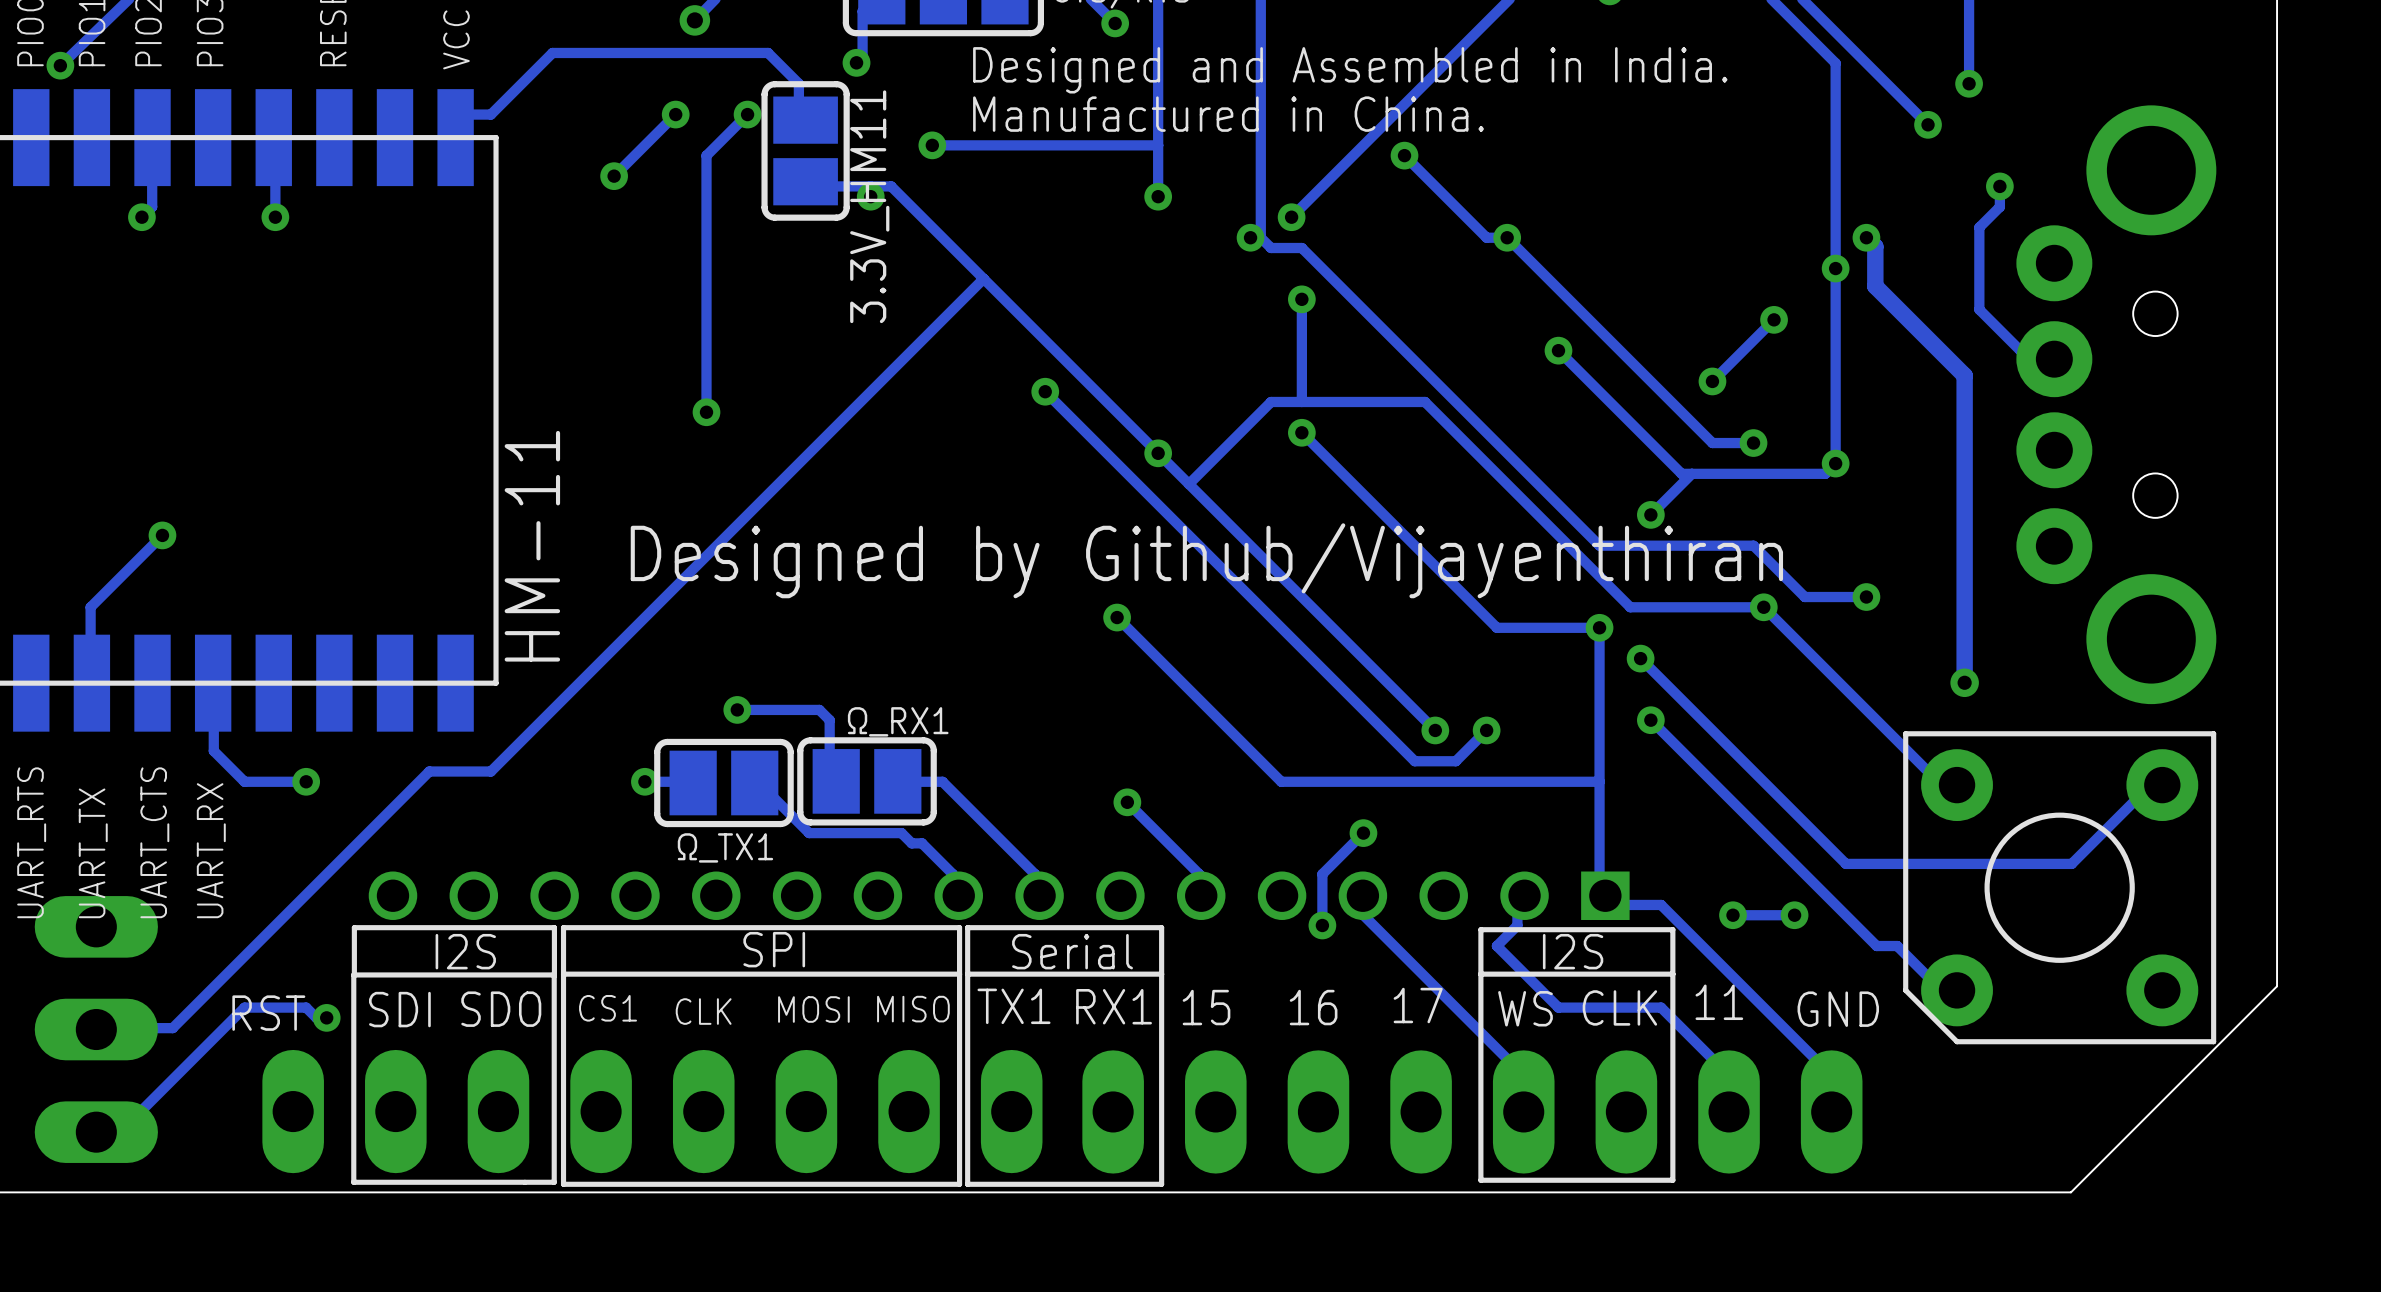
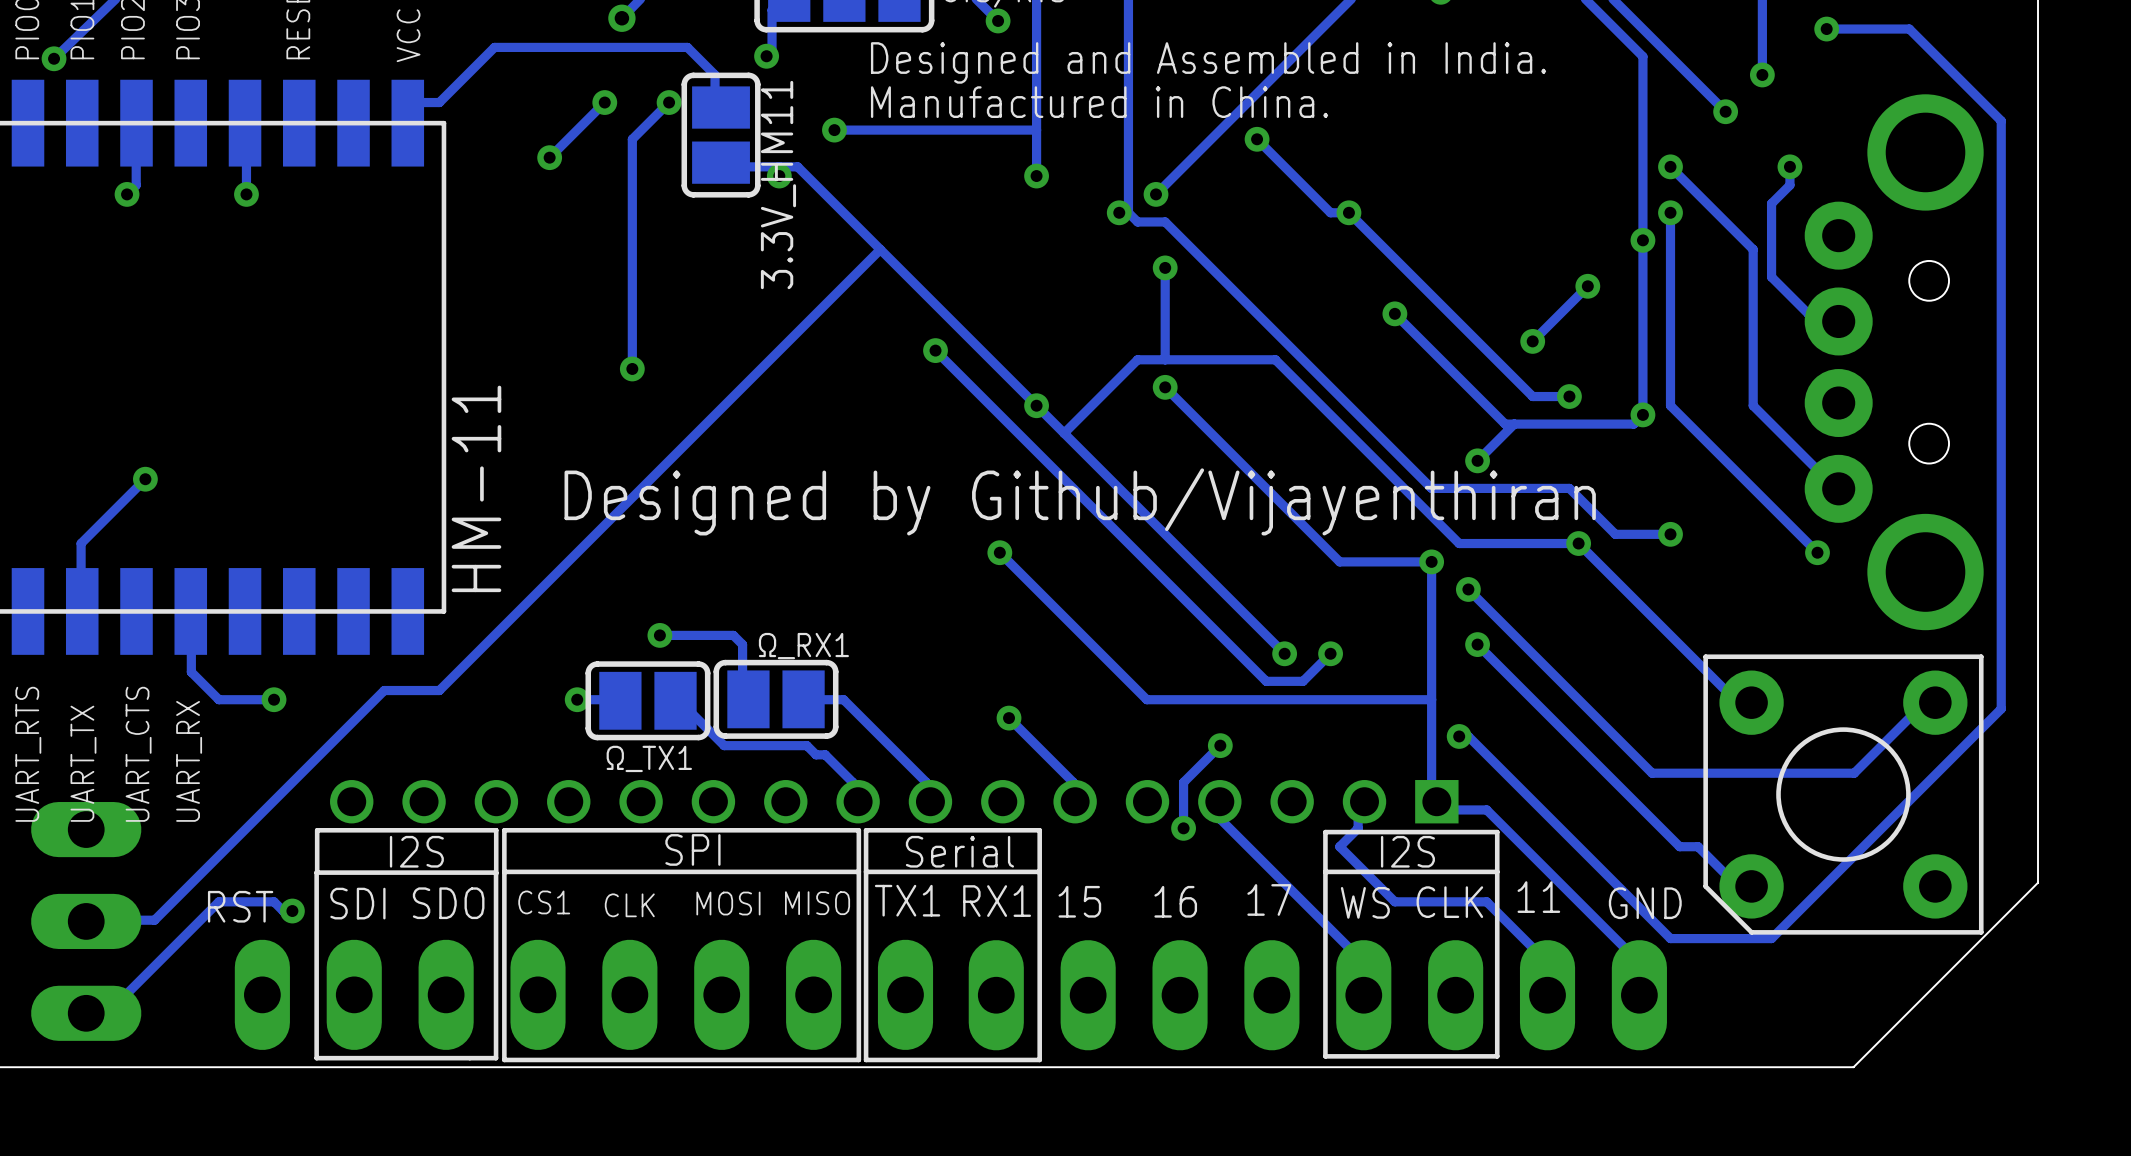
track: none -> (1826, 29) (1909, 29) (2001, 120) (2001, 708) (1771, 938) (1670, 938) (1468, 736) (1459, 736)
via: none -> (1826, 29)
track: none -> (1670, 166) (1753, 249) (1753, 405) (1835, 488) (1838, 488)
via: none -> (1670, 166)
track: (1866, 237) (1875, 246) (1875, 286) (1964, 375) (1964, 682) -> (1670, 212) (1670, 405) (1817, 552)
via: none -> (1817, 552)
via: (1964, 682) -> none
via: none -> (1459, 736)
via: (1732, 915) -> none
track: (1794, 915) (1732, 915) -> none
via: (1794, 915) -> none

